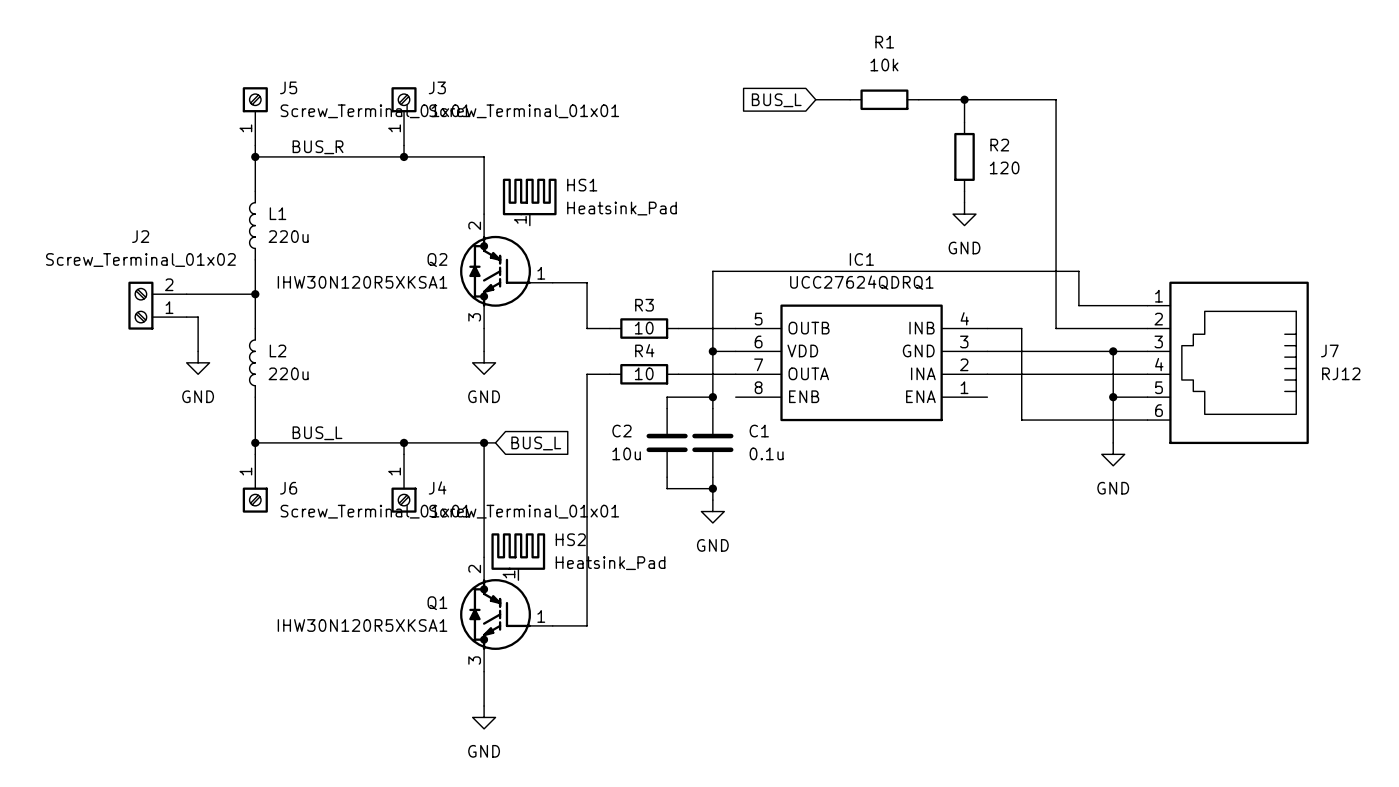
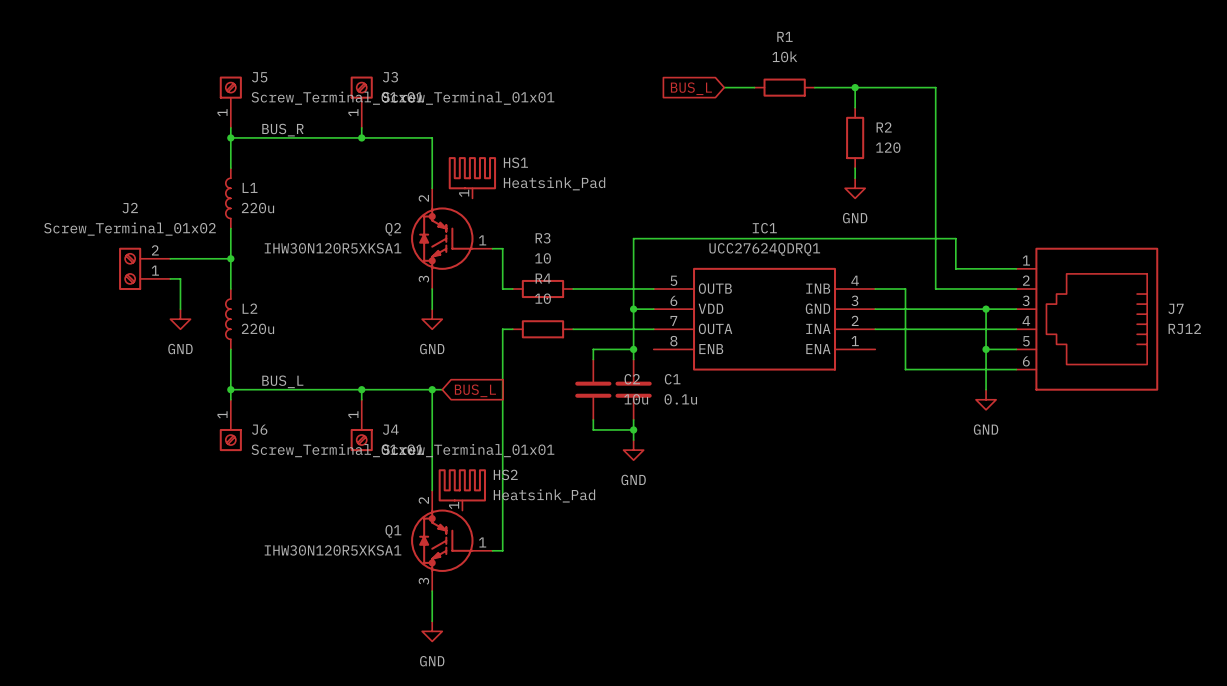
wire: (564, 282) (587, 282) (587, 328) (609, 328) -> (502, 248) (502, 289) (512, 289)
R3 name position: R3 (644, 305) -> R3 (543, 238)
wire: none -> (573, 289) (603, 289)
R3 position: (644, 328) -> (542, 289)
R3 value position: 10 (644, 328) -> 10 (542, 258)
R4 name position: R4 (644, 350) -> R4 (543, 278)
R4 value position: 10 (644, 373) -> 10 (542, 298)
wire: (609, 374) (587, 374) (587, 625) (564, 625) -> (512, 329) (502, 329) (502, 550)
wire: none -> (573, 329) (603, 329)
R4 position: (644, 374) -> (542, 329)
C2 name position: C2 (621, 431) -> C2 (632, 379)
C2 value position: 10u (626, 453) -> 10u (636, 399)

